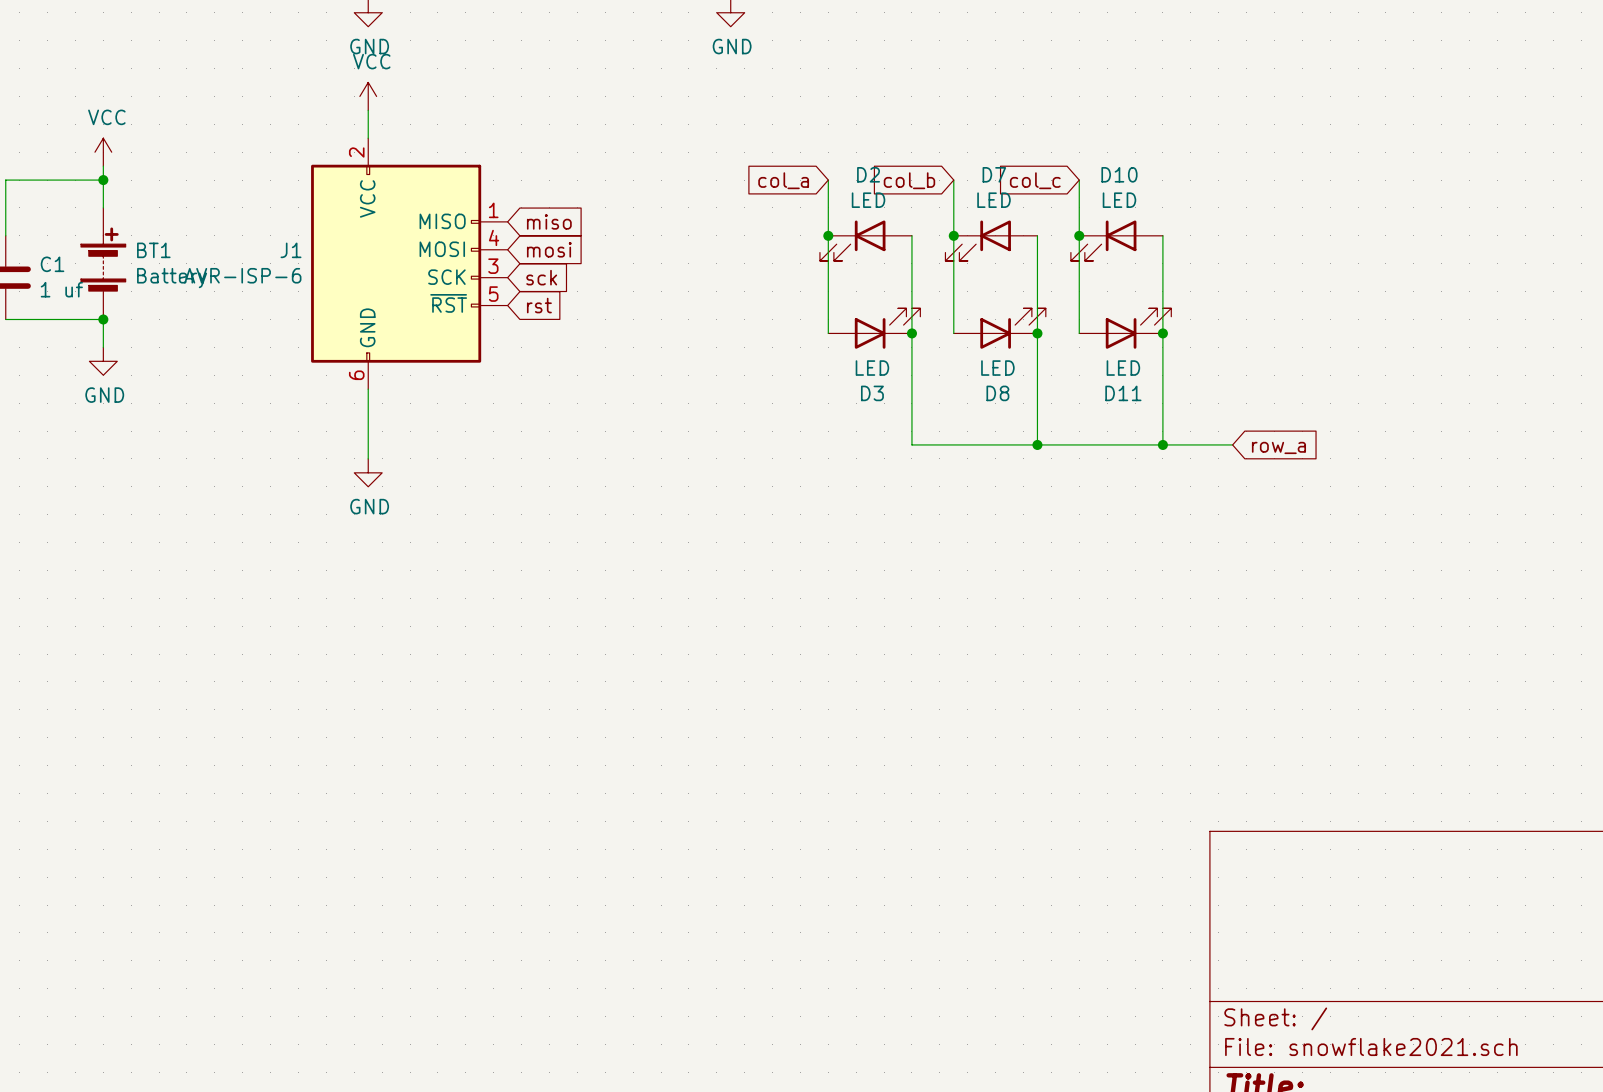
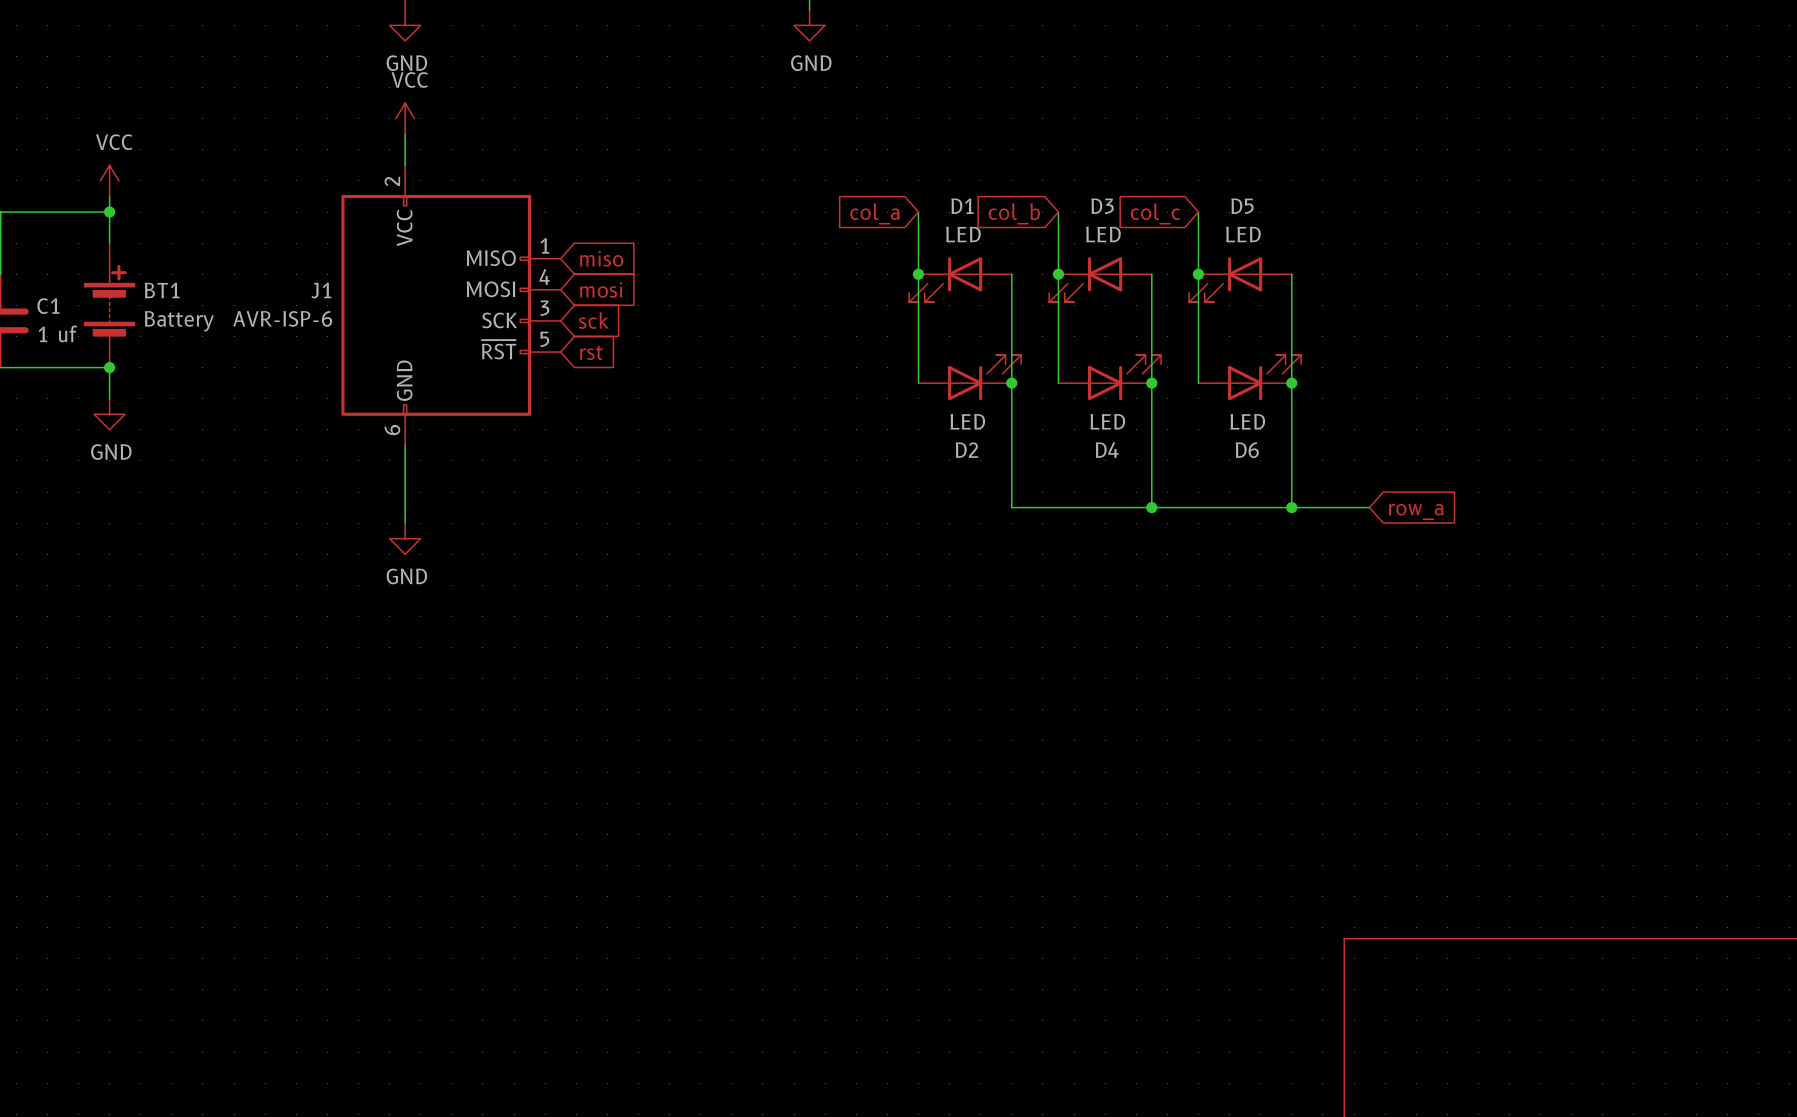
D2 name: D2 (868, 174) -> D1 (962, 206)
D7 name: D7 (994, 174) -> D3 (1102, 206)
D10 name: D10 (1119, 174) -> D5 (1242, 206)
D3 name: D3 (872, 393) -> D2 (966, 450)
D8 name: D8 (997, 393) -> D4 (1107, 450)
D11 name: D11 (1123, 393) -> D6 (1247, 450)

